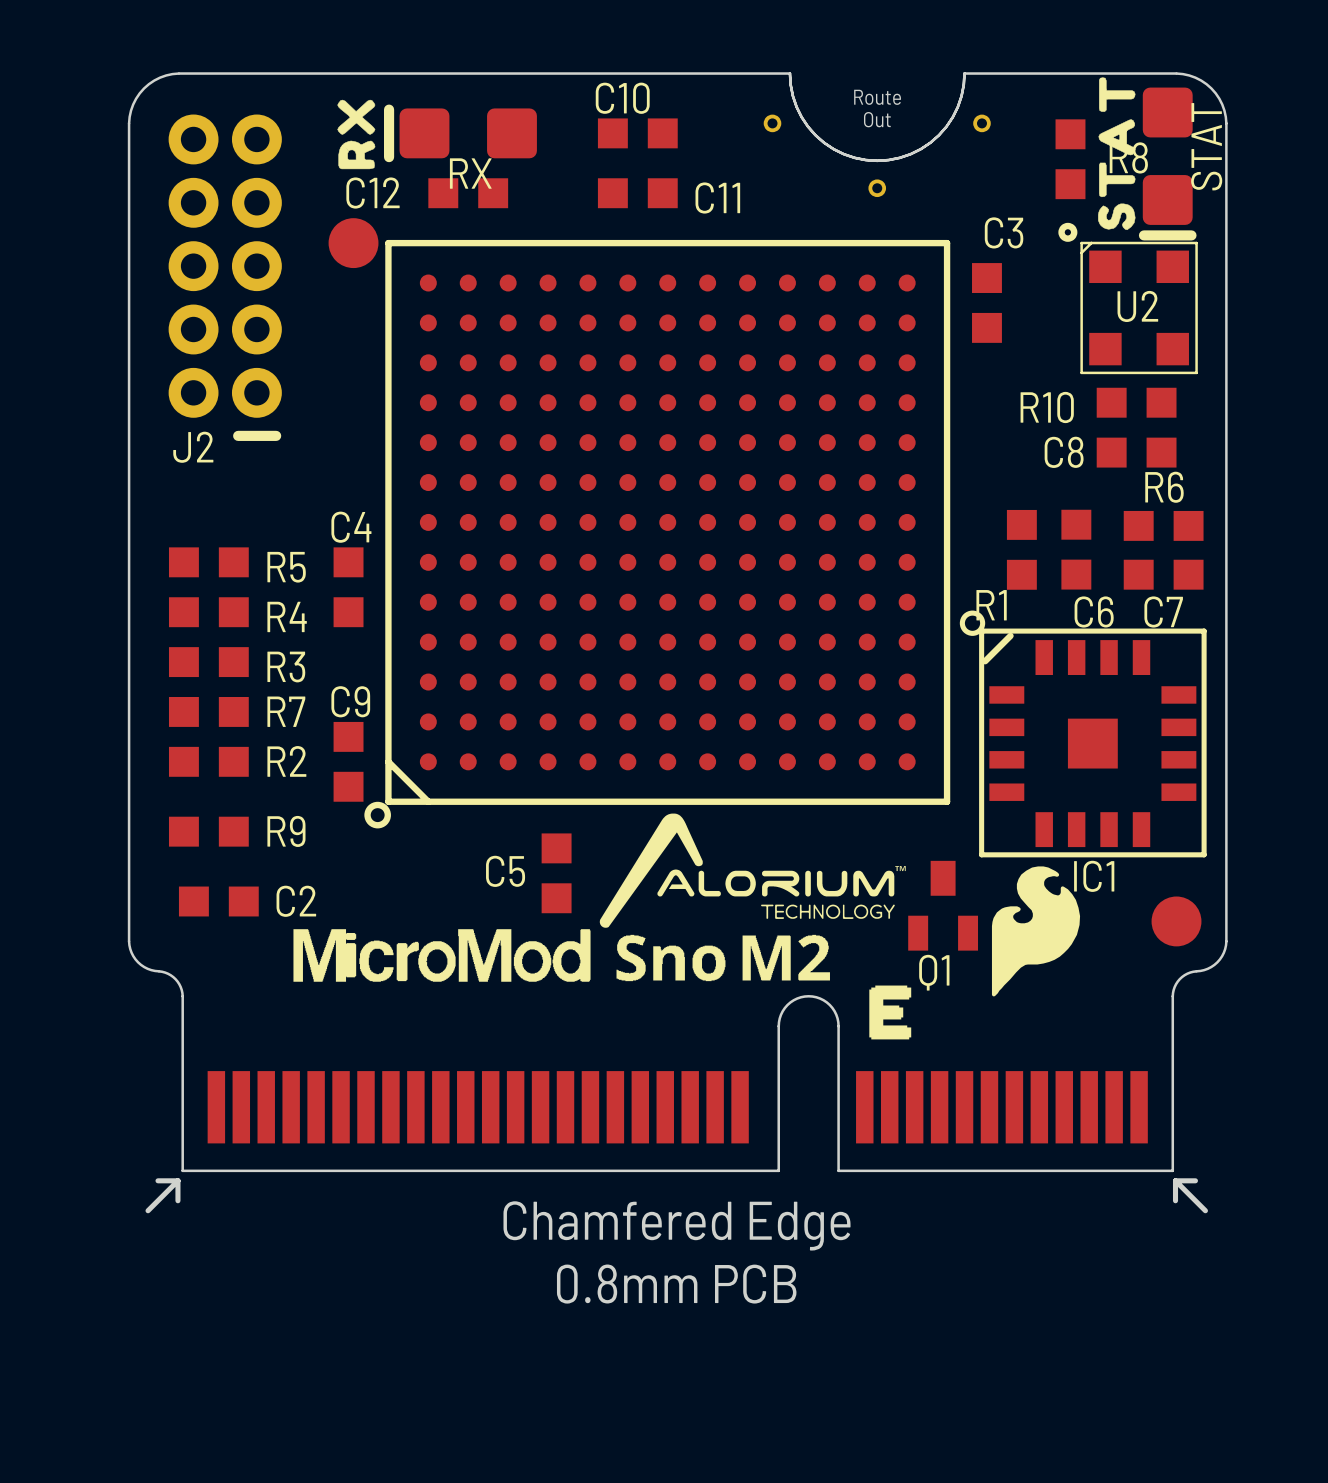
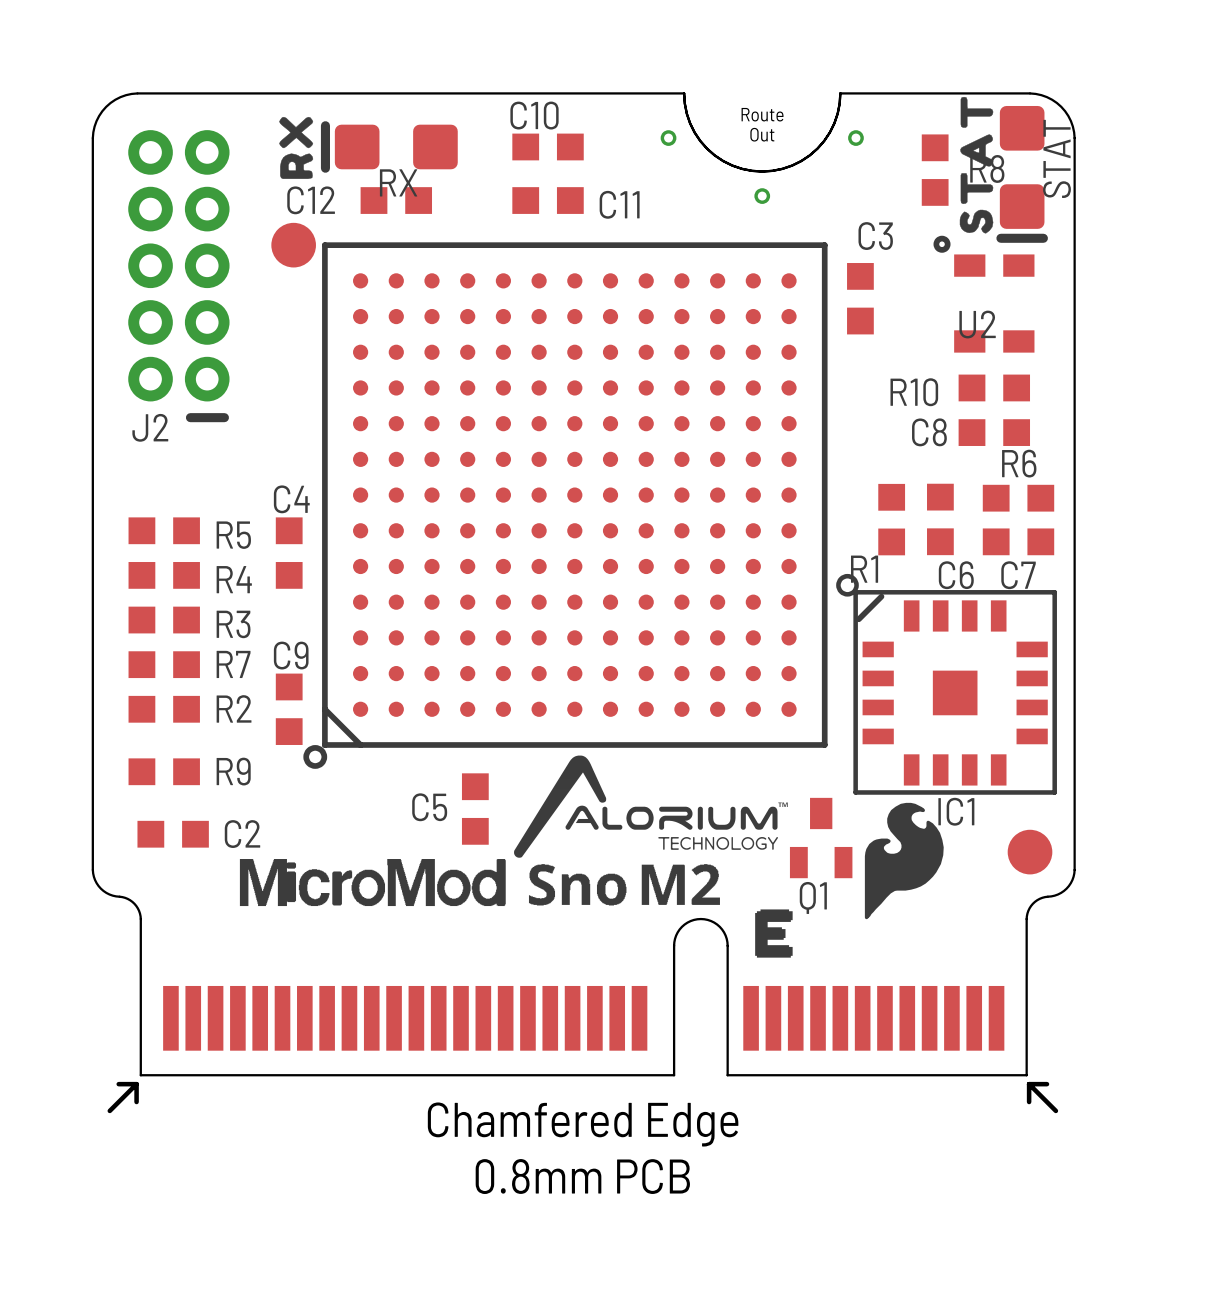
U2 footprint: [1058, 222, 1198, 375] -> [933, 235, 1035, 353]

